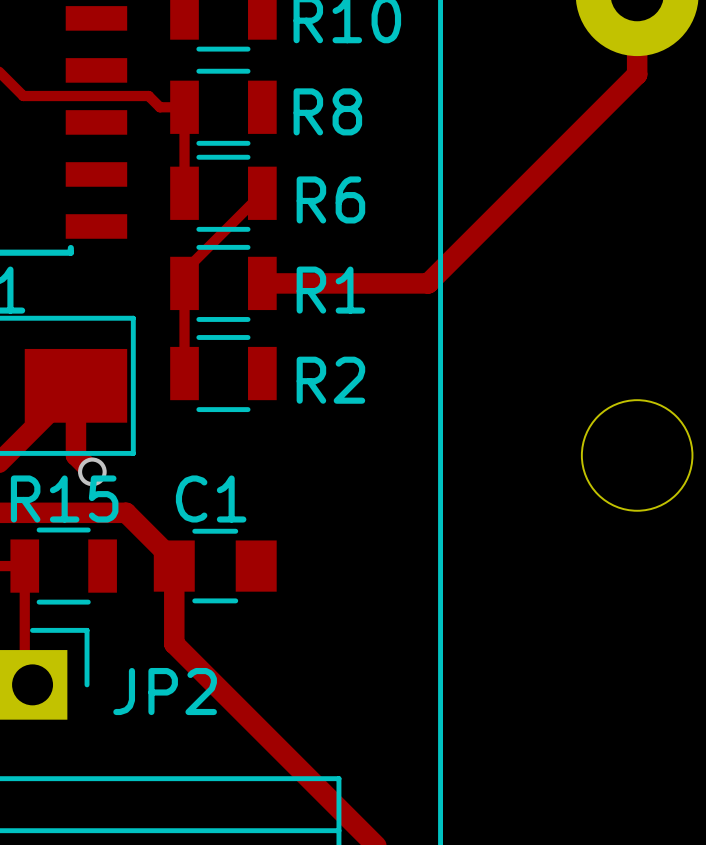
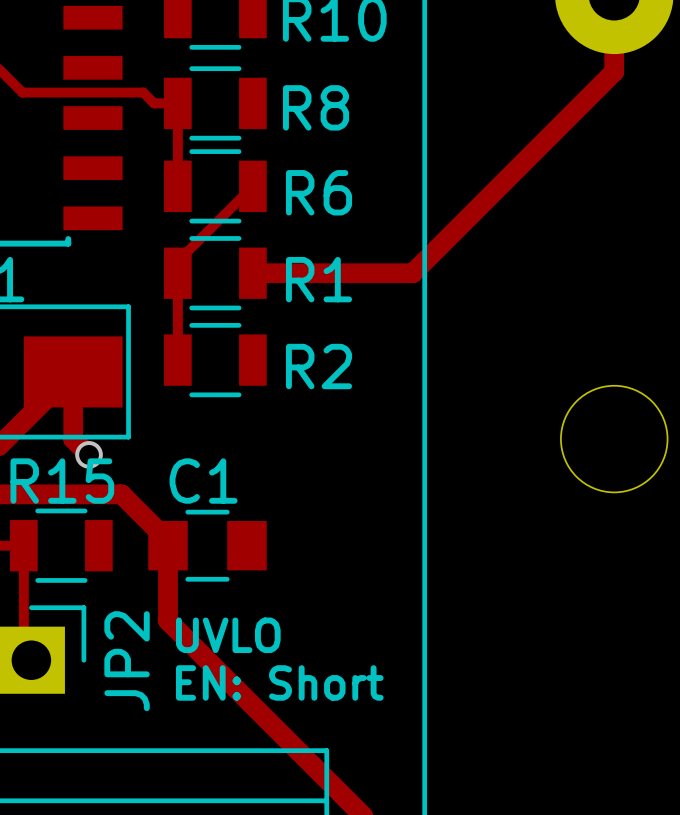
text: none -> UVLO (228, 635)
JP2 name rotation: 0° (165, 691) -> 90° counterclockwise (127, 661)
text: none -> EN: Short (279, 682)

